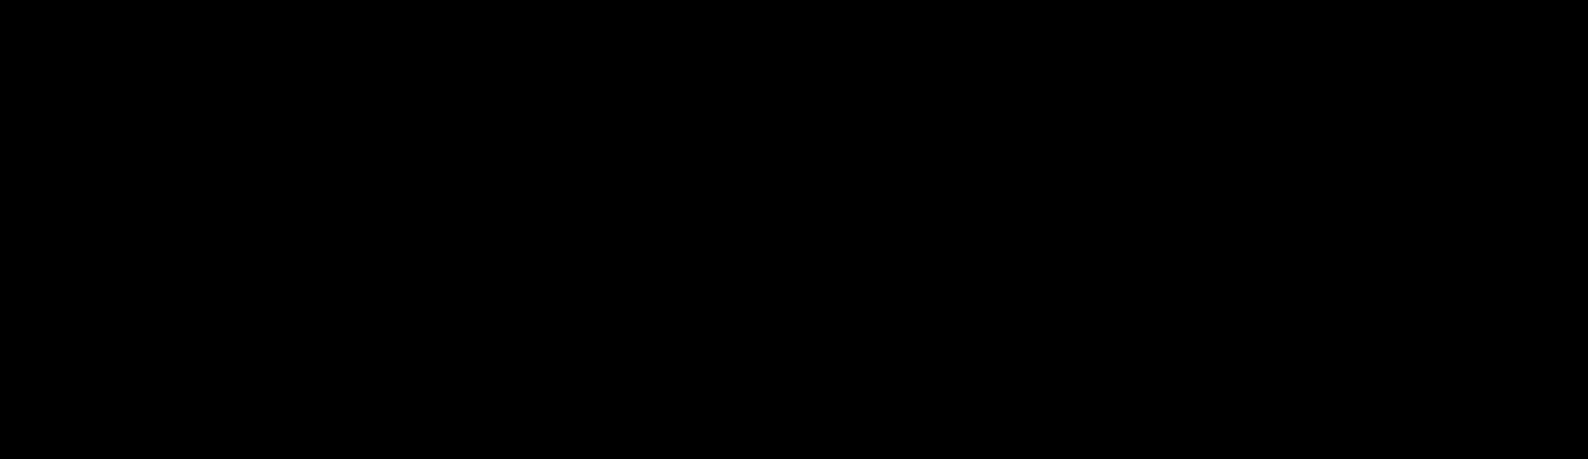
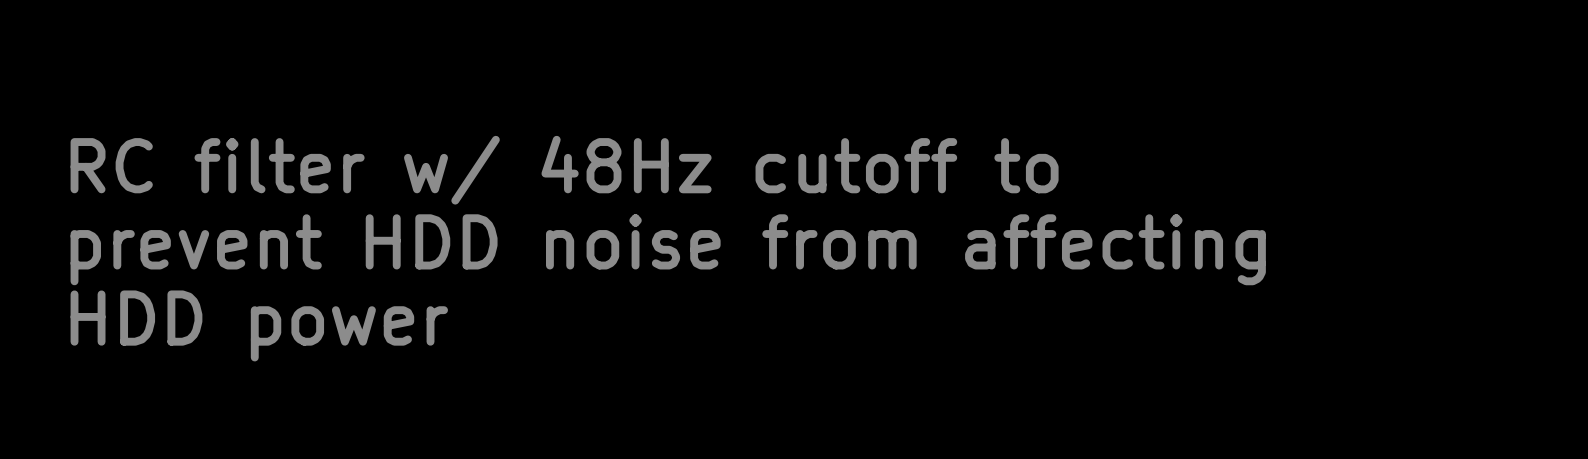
text: none -> RC filter w/ 48Hz cutoff to (564, 170)
text: none -> prevent HDD noise from affecting (668, 249)
text: none -> HDD power (259, 325)

